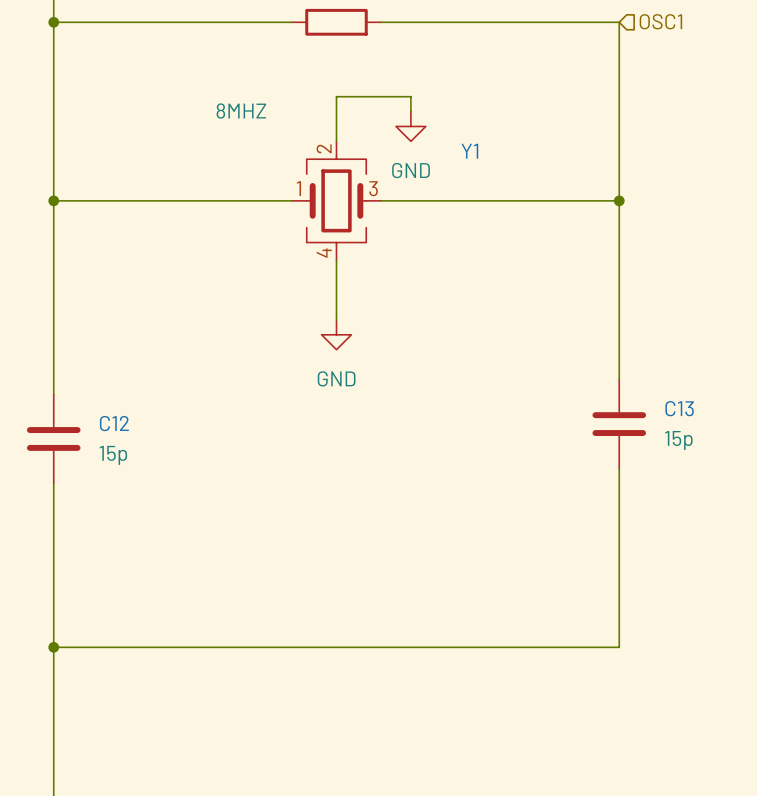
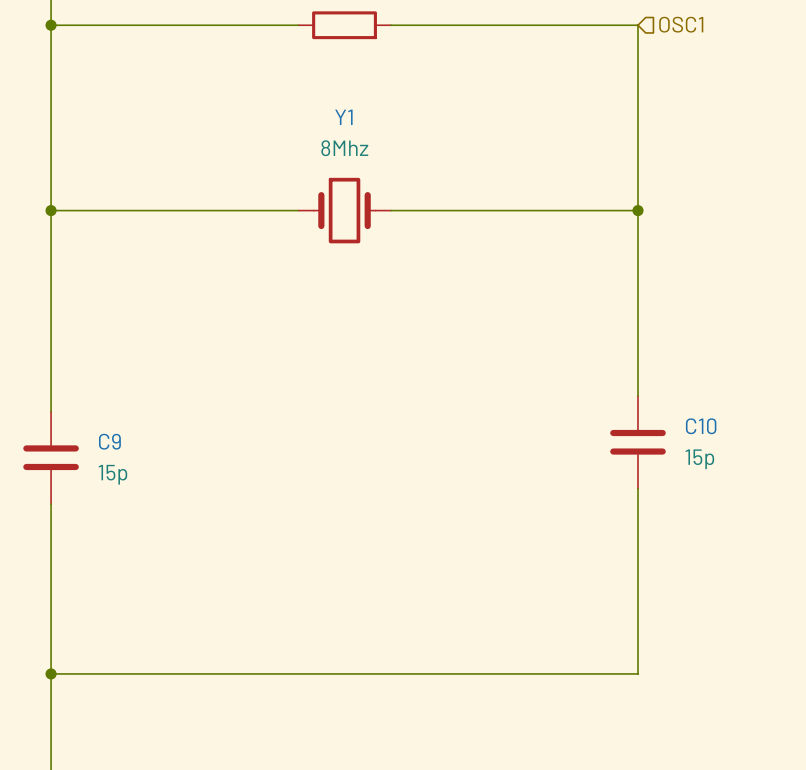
Y1 value: 8MHZ (241, 111) -> 8Mhz (344, 148)
wire: (410, 111) (410, 96) (336, 96) (336, 141) -> none
power symbol: GND (410, 126) -> none
Y1 symbol: [291, 141, 382, 261] -> [298, 177, 391, 244]
Y1 name position: Y1 (469, 151) -> Y1 (343, 117)
wire: (336, 260) (336, 319) -> none
power symbol: GND (336, 334) -> none
C13 name: C13 (679, 408) -> C10 (701, 426)
C12 name: C12 (114, 423) -> C9 (109, 441)

